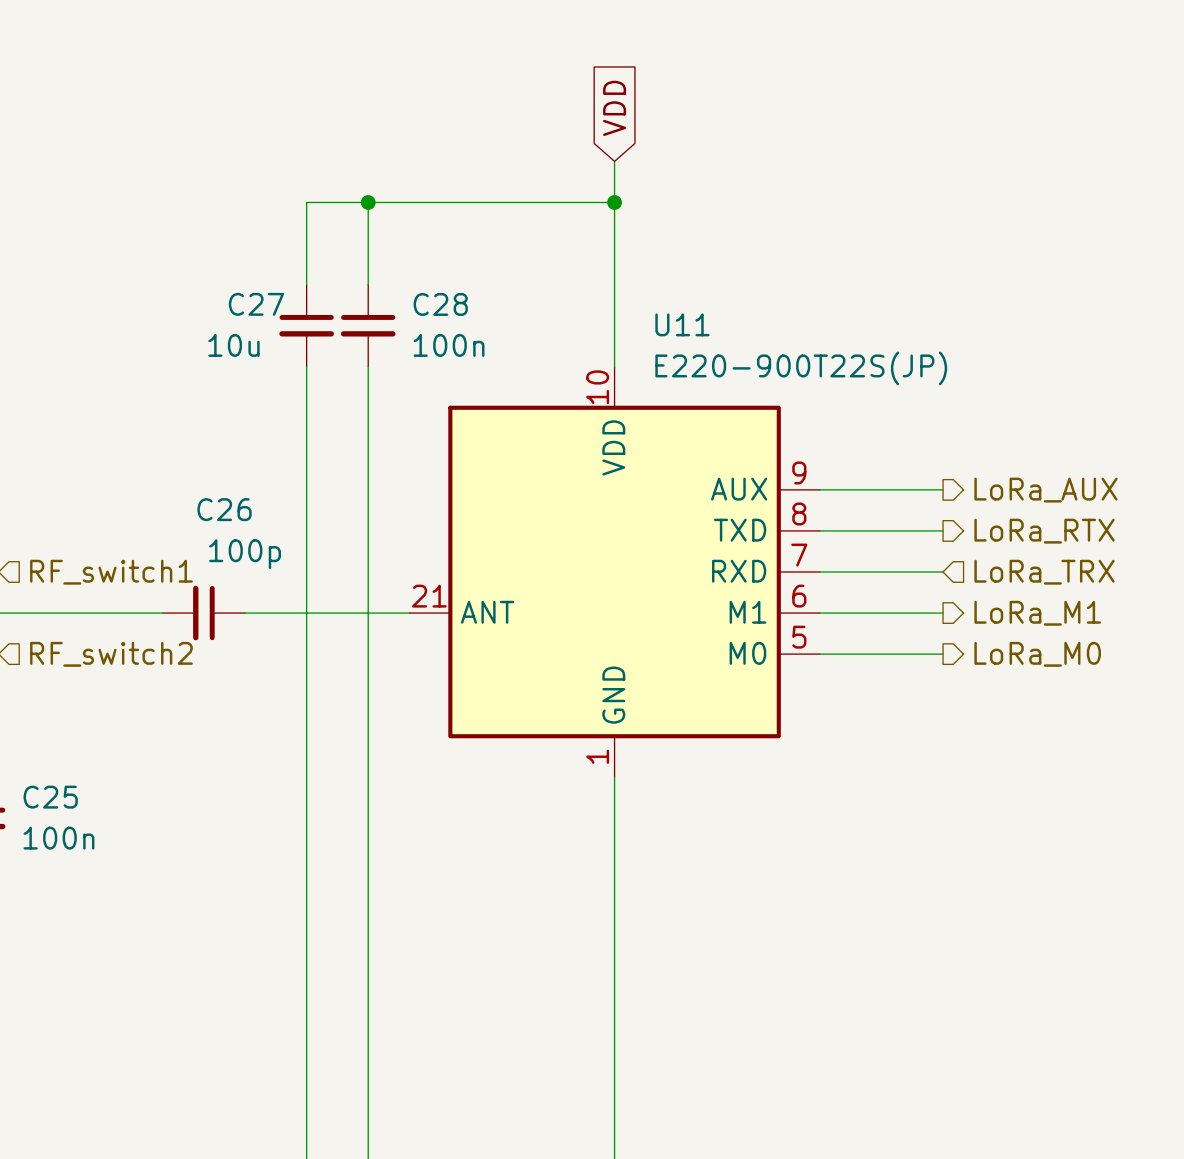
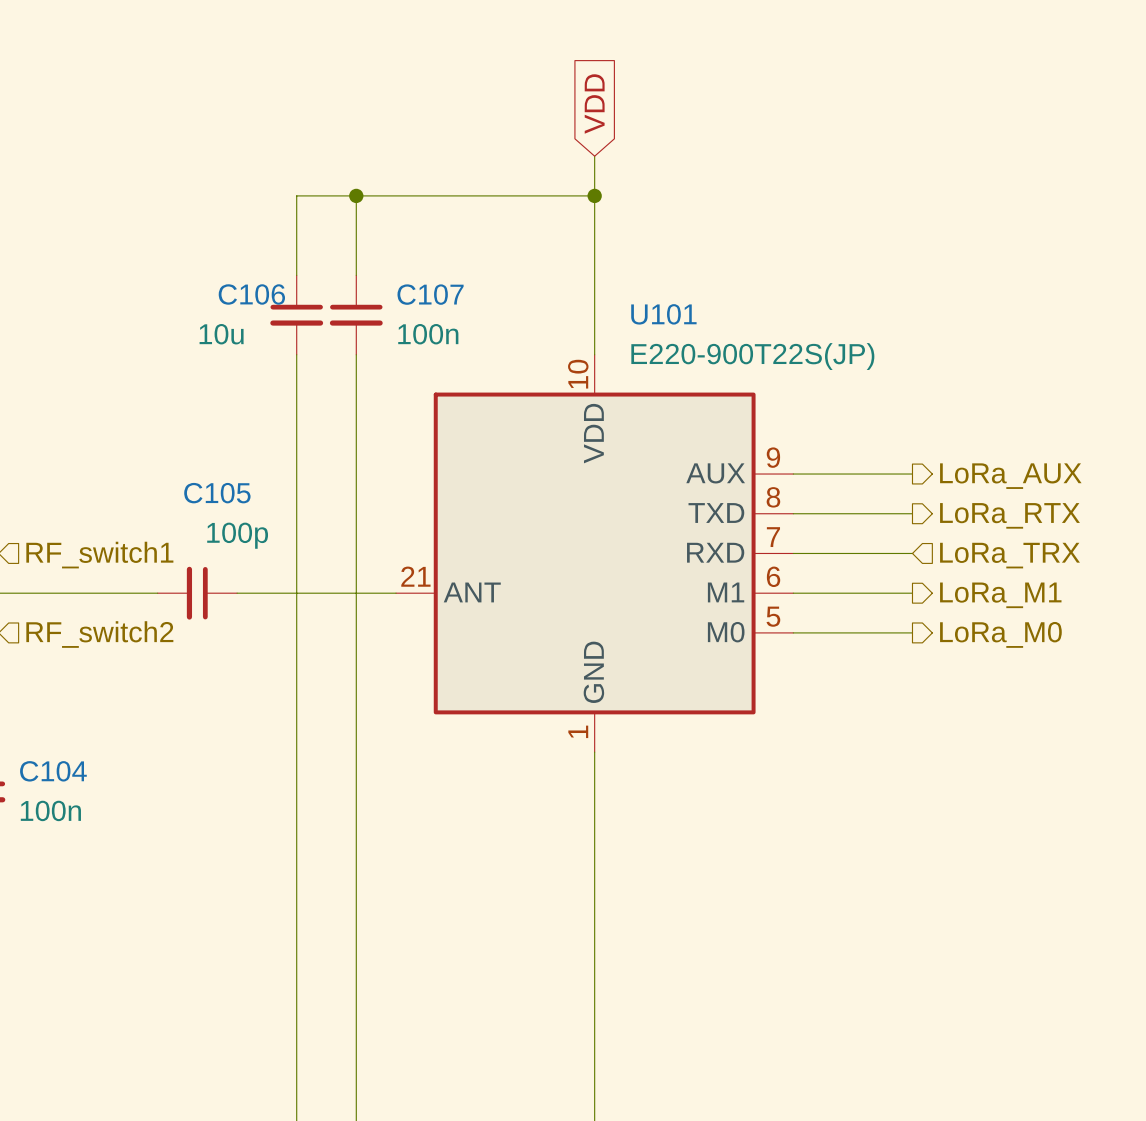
C27 name: C27 (256, 304) -> C106 (251, 294)
C28 name: C28 (440, 304) -> C107 (430, 294)
U11 name: U11 (682, 324) -> U101 (663, 314)
C26 name: C26 (224, 509) -> C105 (217, 493)
C25 name: C25 (50, 797) -> C104 (53, 771)

